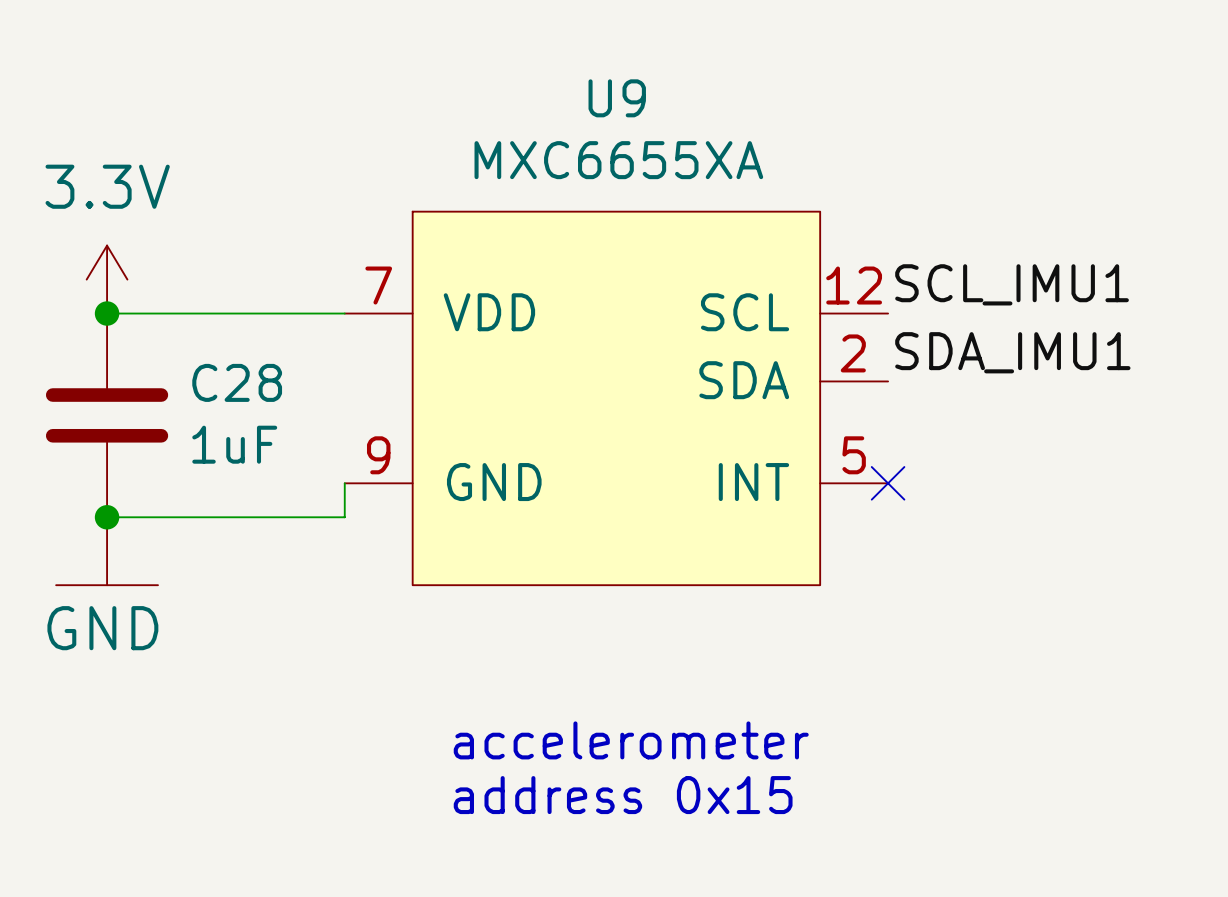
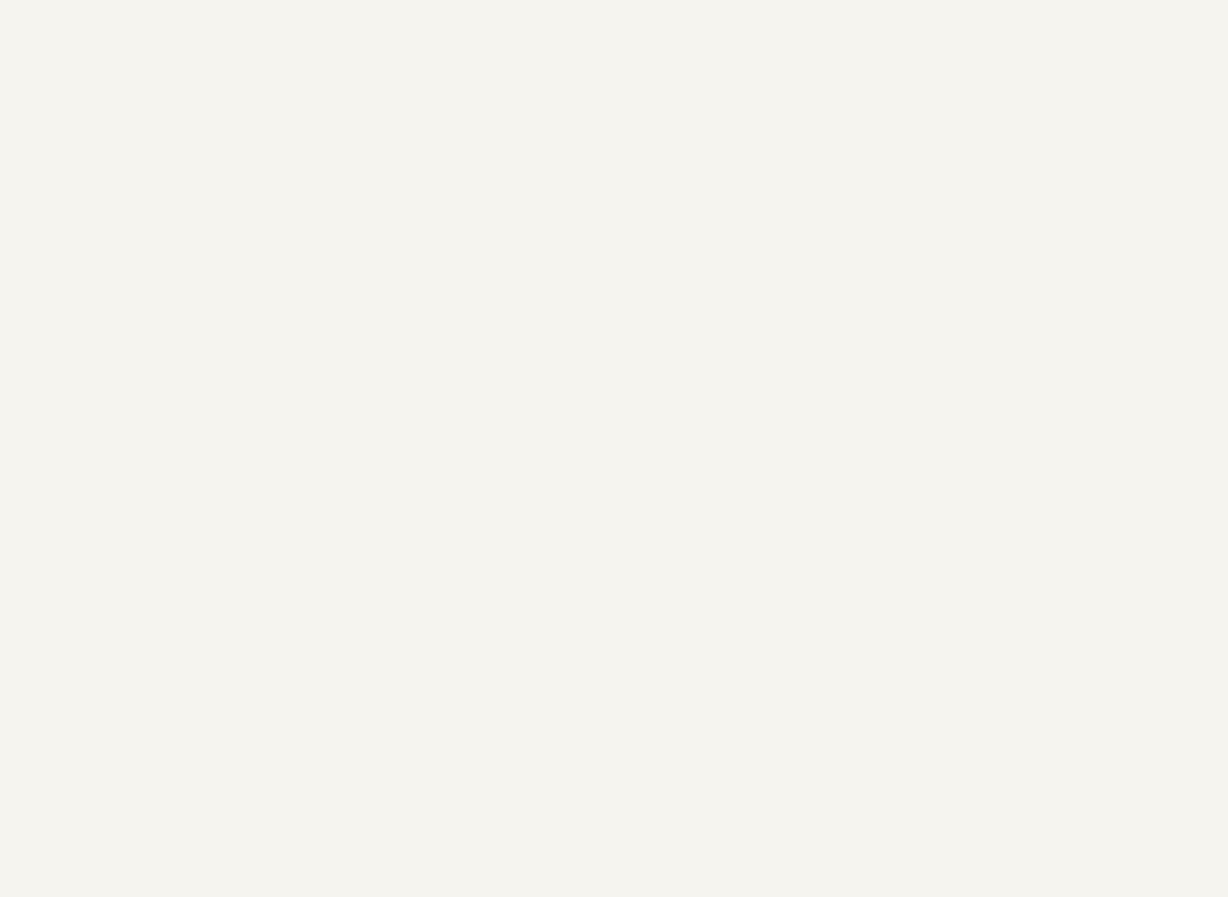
power symbol: 3.3V (107, 279) -> none
label: SCL_IMU1 (1012, 284) -> none
wire: (107, 313) (344, 313) -> none
junction: (107, 313) -> none
label: SDA_IMU1 (1012, 352) -> none
U9: MXC6655XA (616, 398) -> none
C28: 1uF (107, 415) -> none
wire: (344, 483) (344, 517) (107, 517) -> none
no-connect mark: (888, 483) -> none
junction: (107, 517) -> none
power symbol: GND (107, 551) -> none
text: accelerometer (631, 740) -> none
text: address 0x15 (623, 795) -> none

